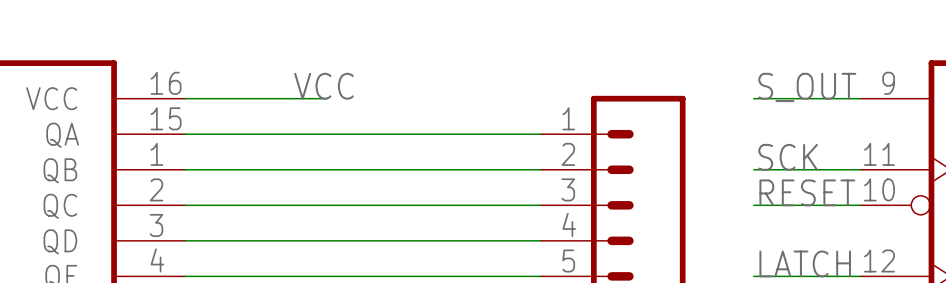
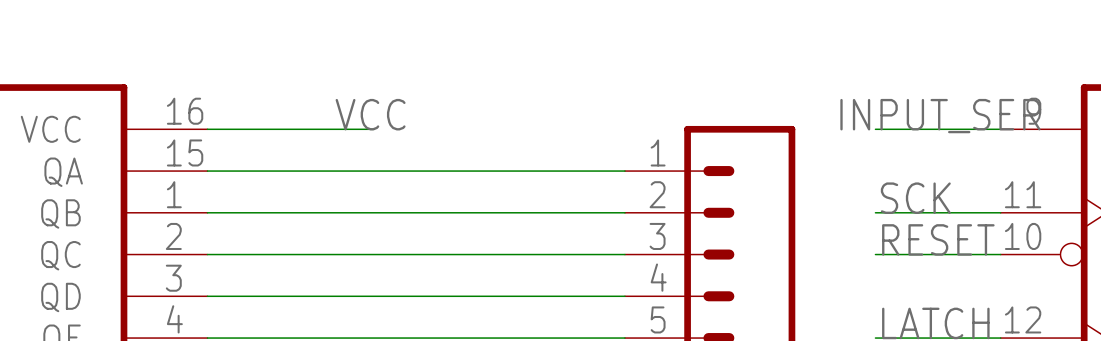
label: S_OUT (807, 87) -> none
label: none -> INPUT_SER (940, 116)

